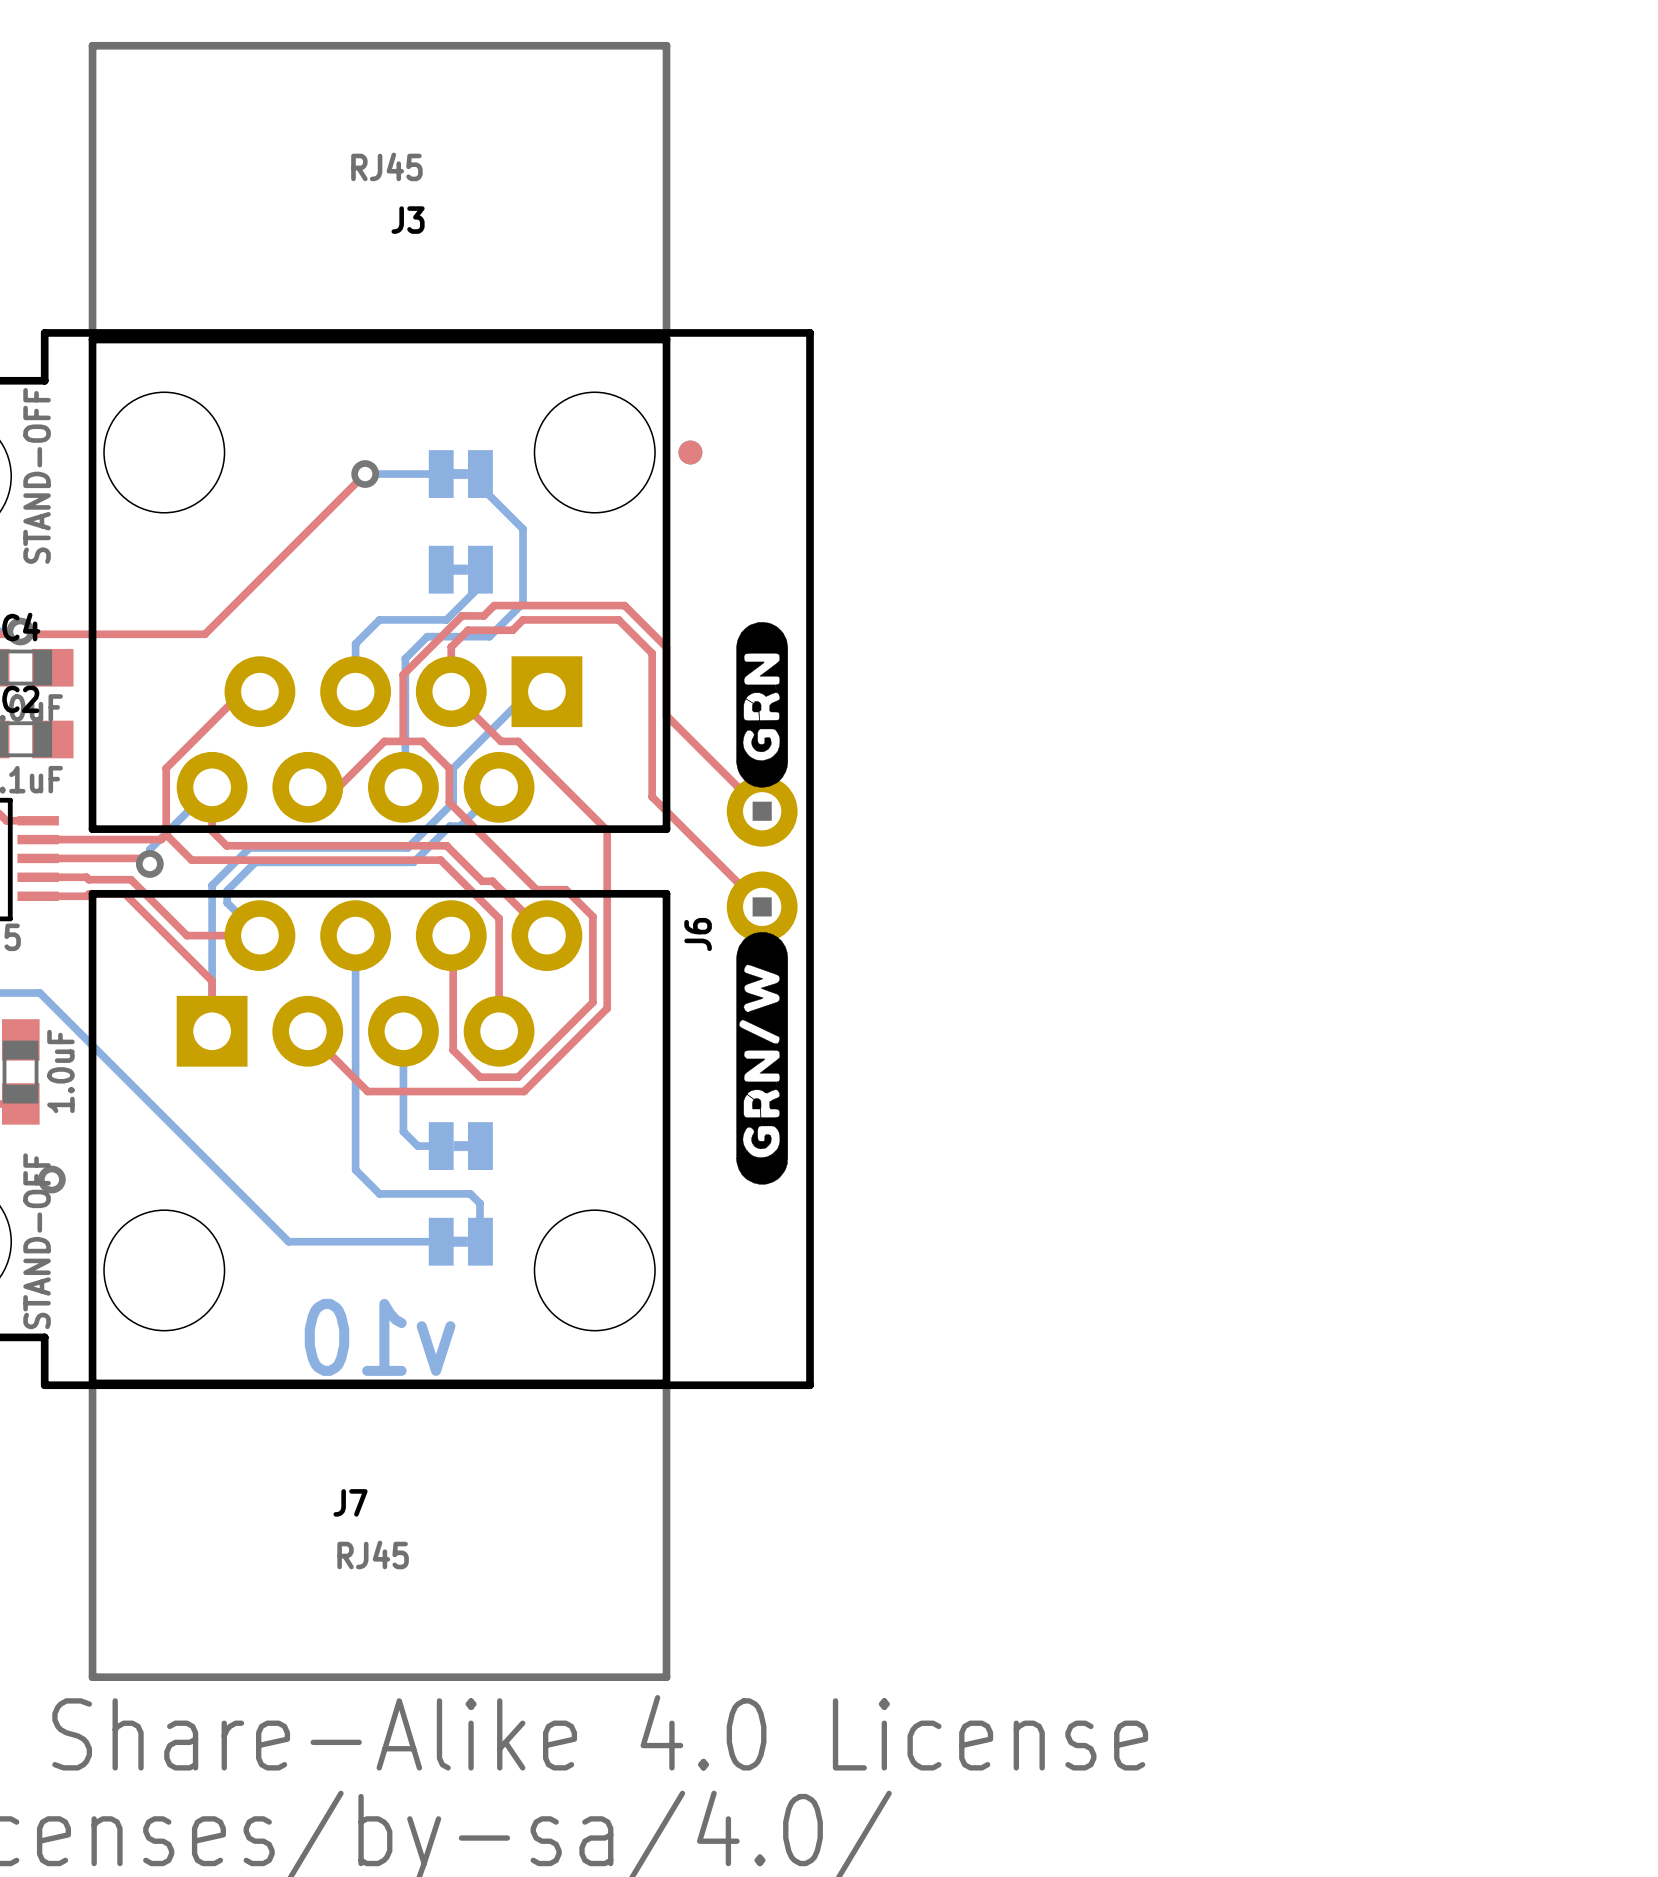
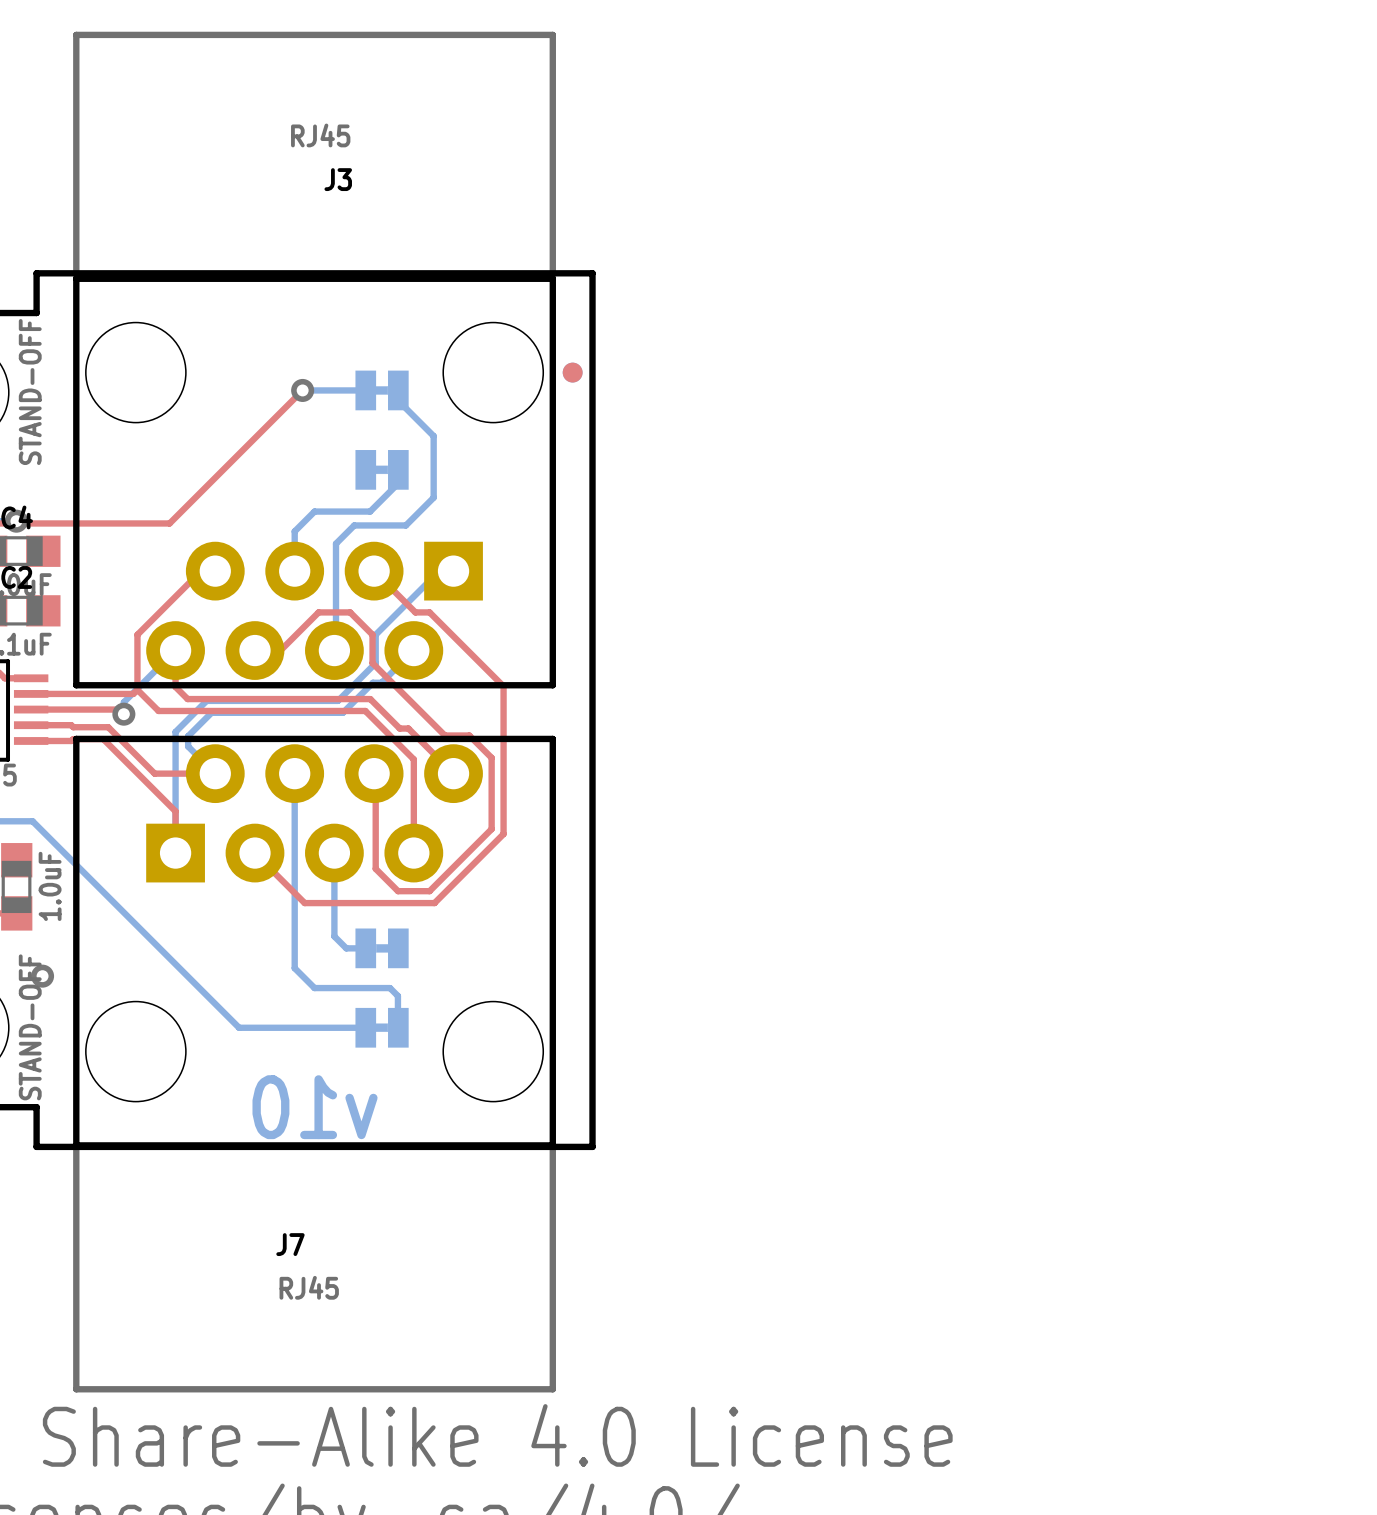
board edge: (714, 332) (810, 332) (810, 1385) (714, 1385) -> (592, 273) (592, 1146)
drawing: [736, 622, 788, 788] -> none
top track: (451, 691) (451, 647) (468, 630) (512, 630) (523, 619) (618, 619) (652, 653) (652, 796) (762, 906) -> none
top track: (403, 741) (403, 674) (462, 615) (483, 615) (494, 605) (624, 605) (666, 647) (666, 715) (762, 811) -> none
J6: (762, 859) -> none
drawing: [736, 932, 788, 1185] -> none

